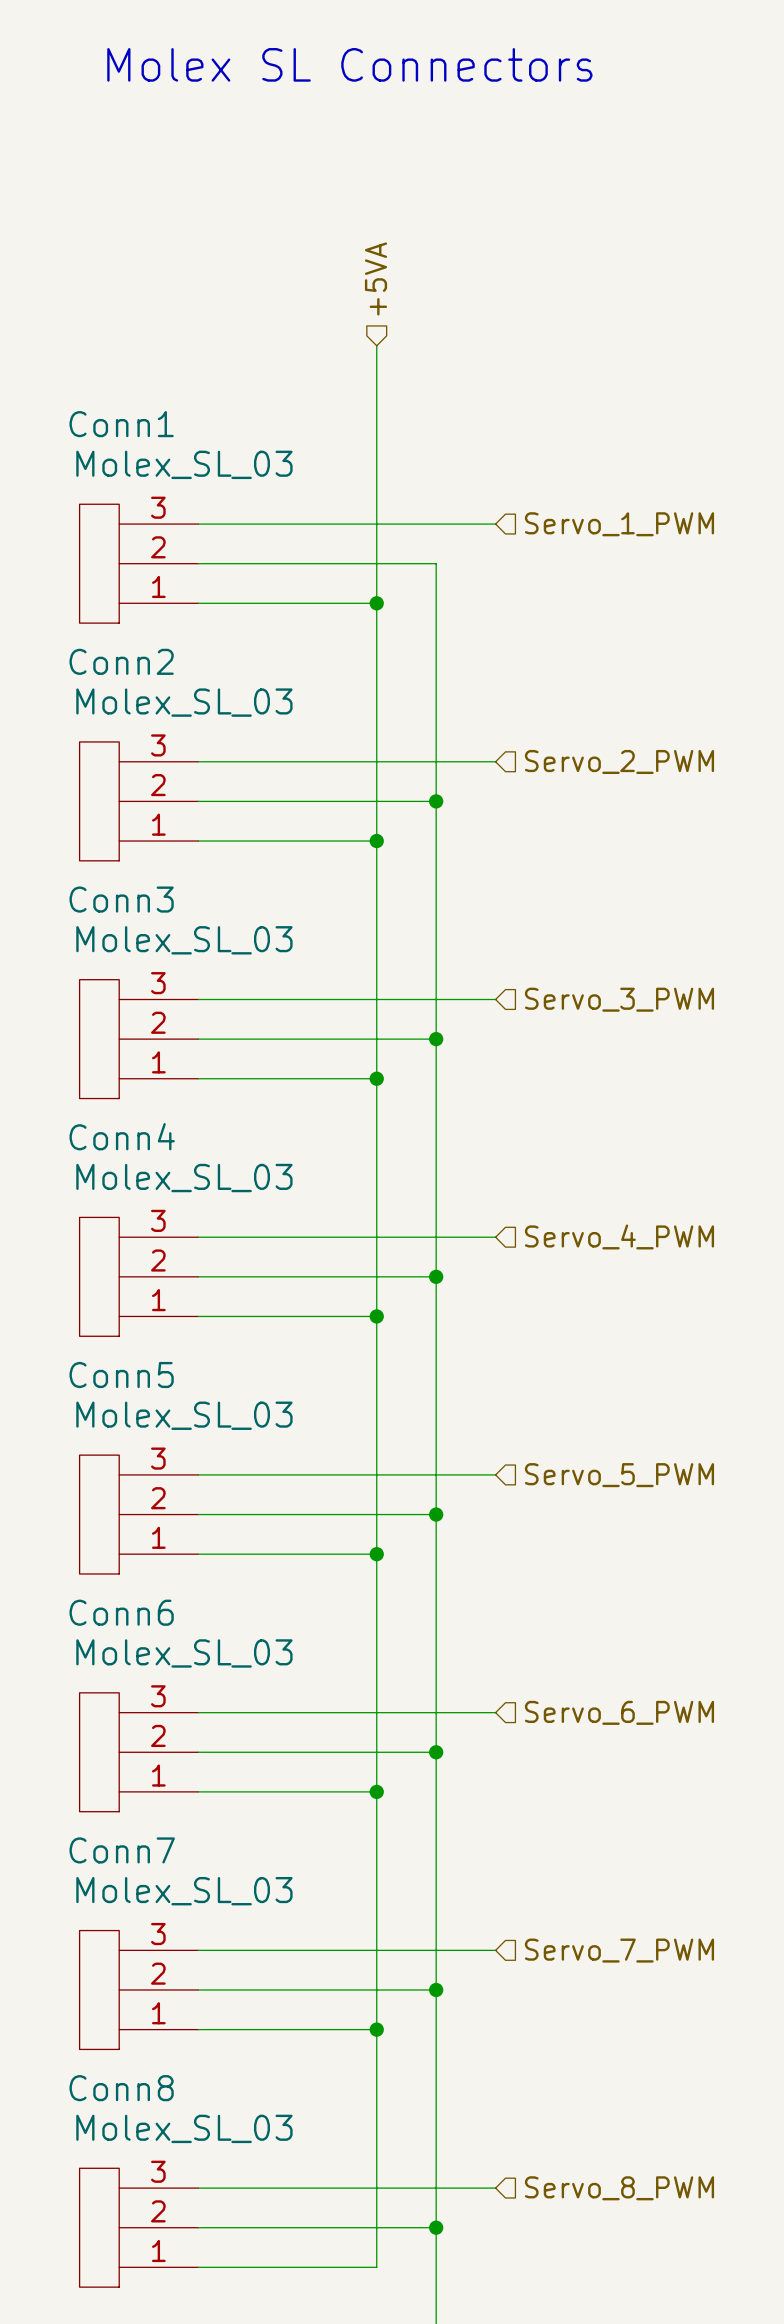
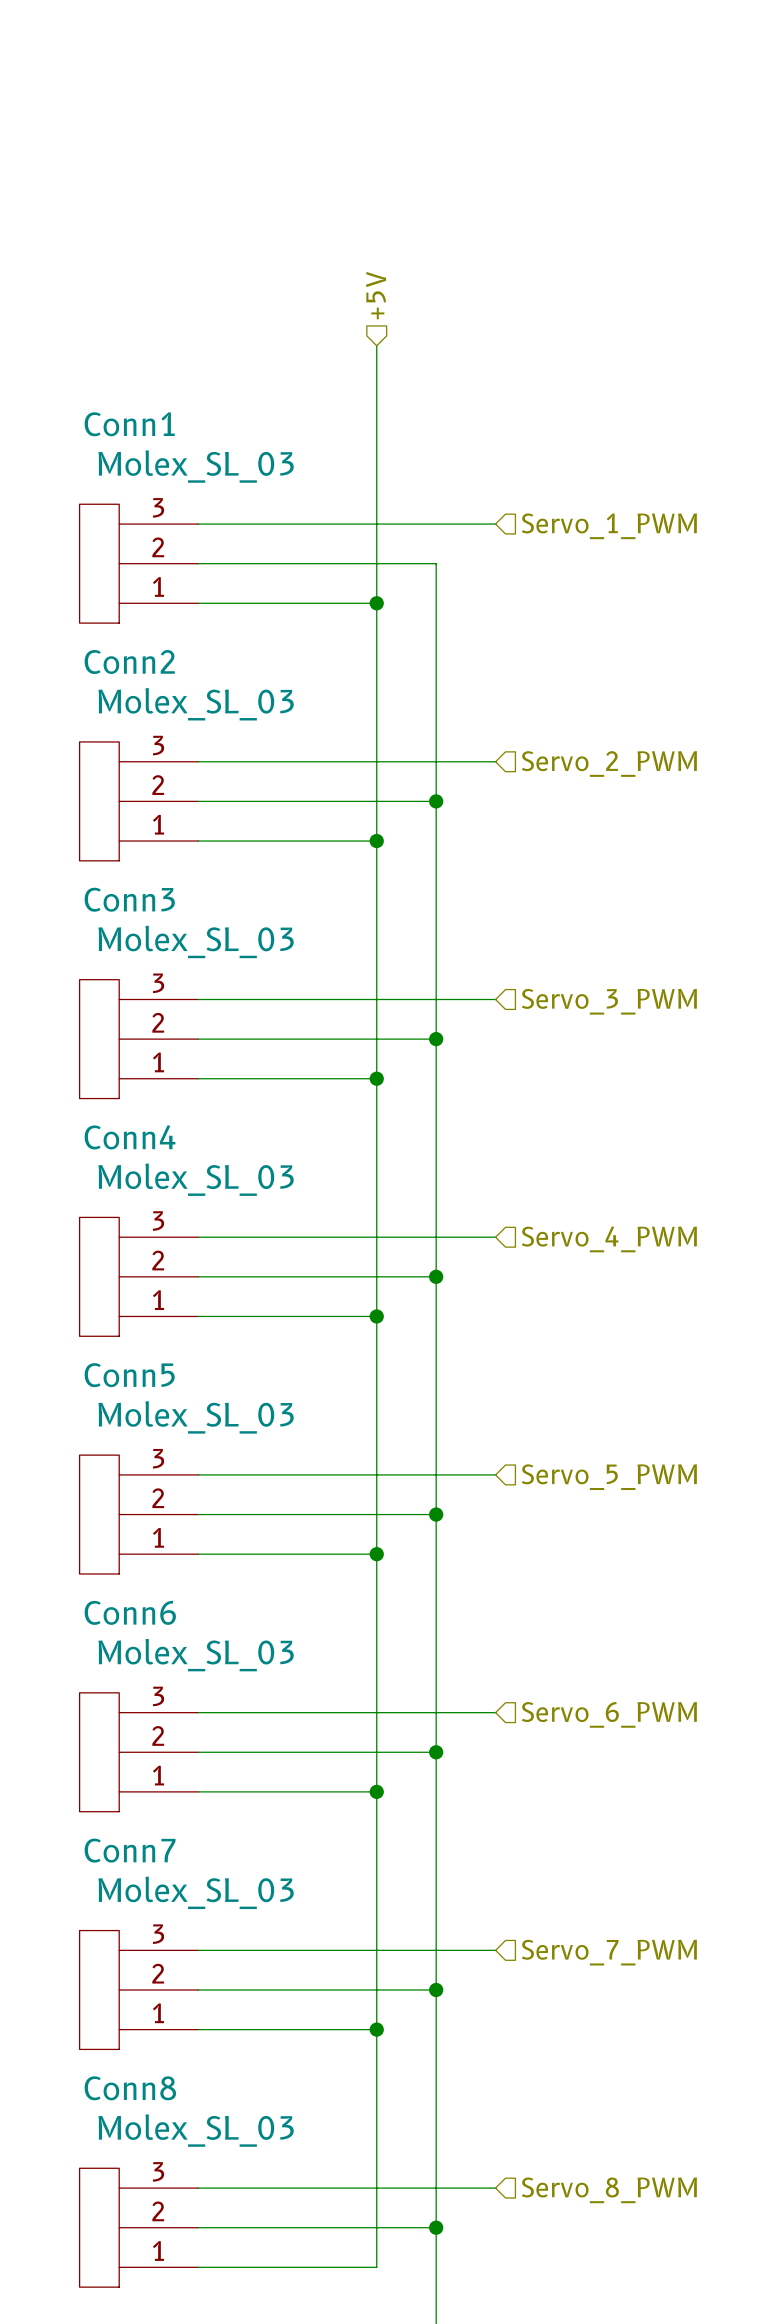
text: Molex SL Connectors (349, 64) -> none
hierarchical label: +5VA (376, 278) -> +5V (376, 295)

